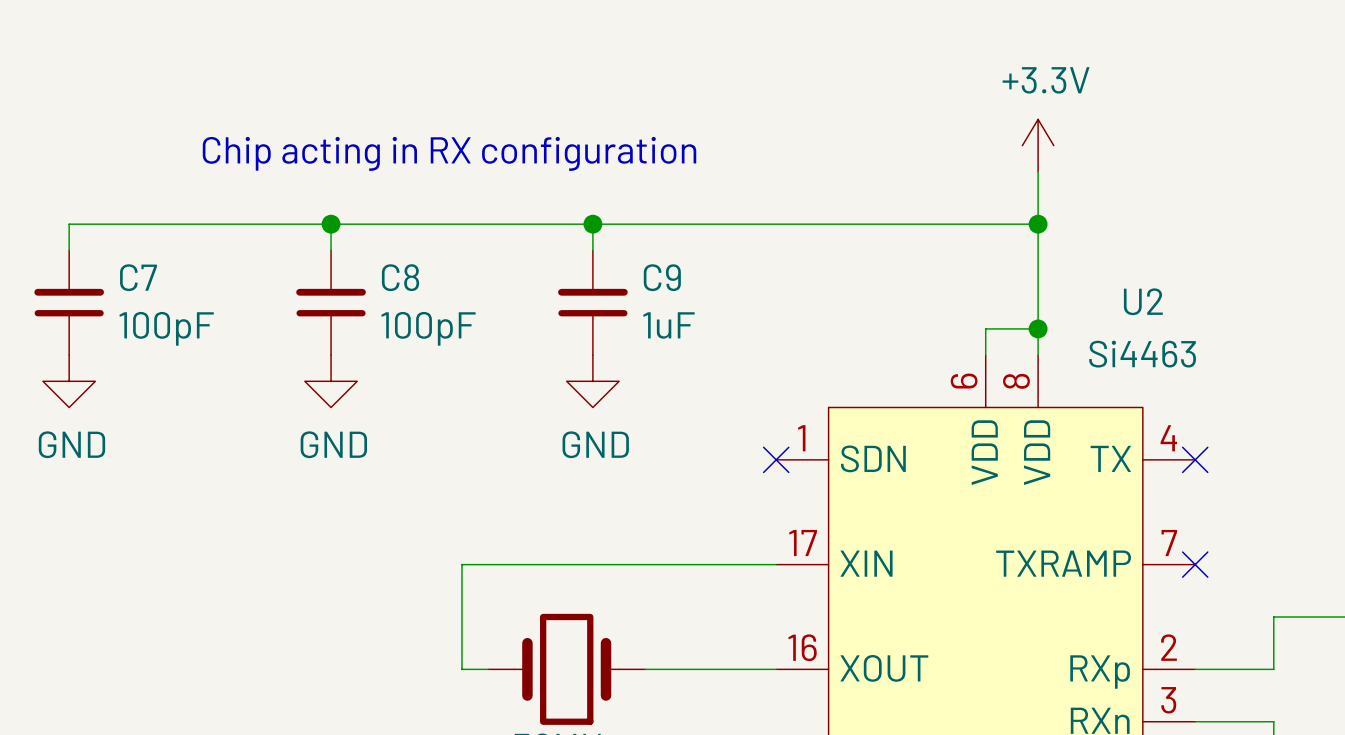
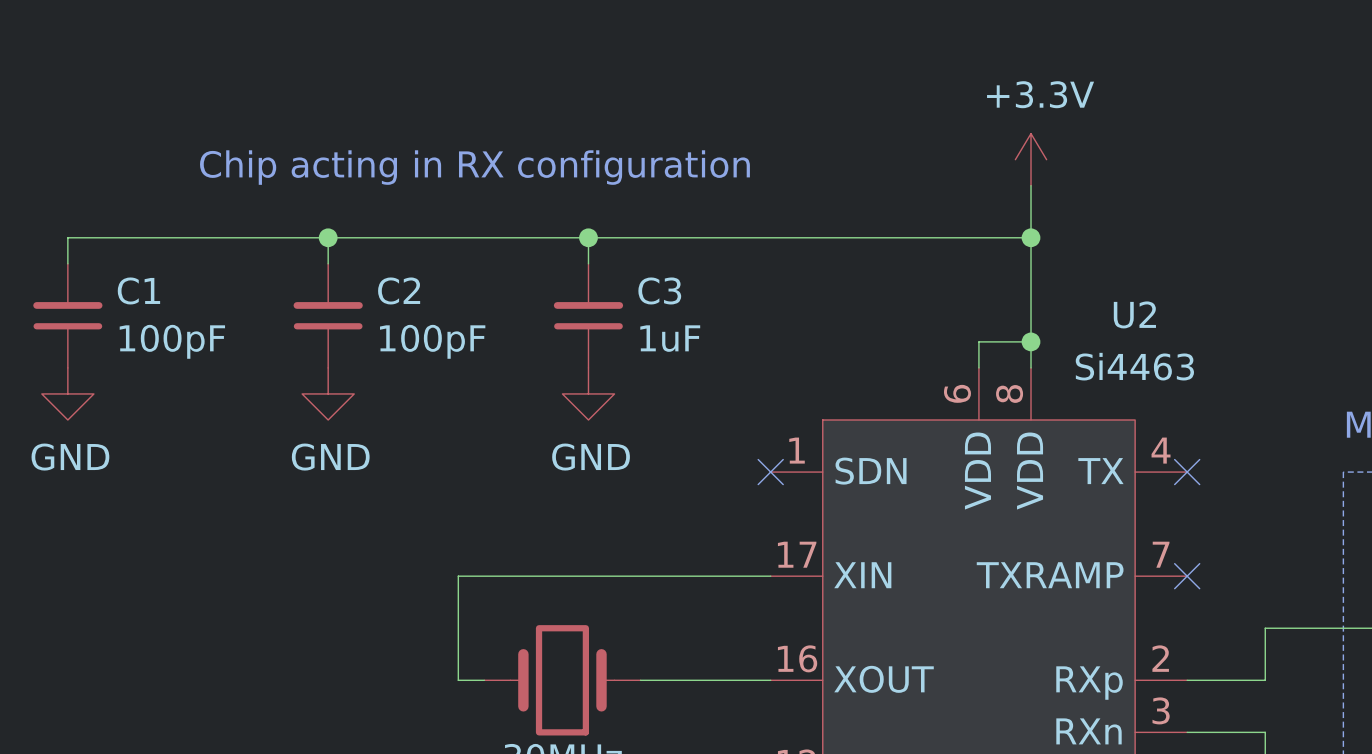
C7 name: C7 (138, 277) -> C1 (138, 290)
C8 name: C8 (400, 277) -> C2 (399, 290)
C9 name: C9 (662, 277) -> C3 (659, 290)

